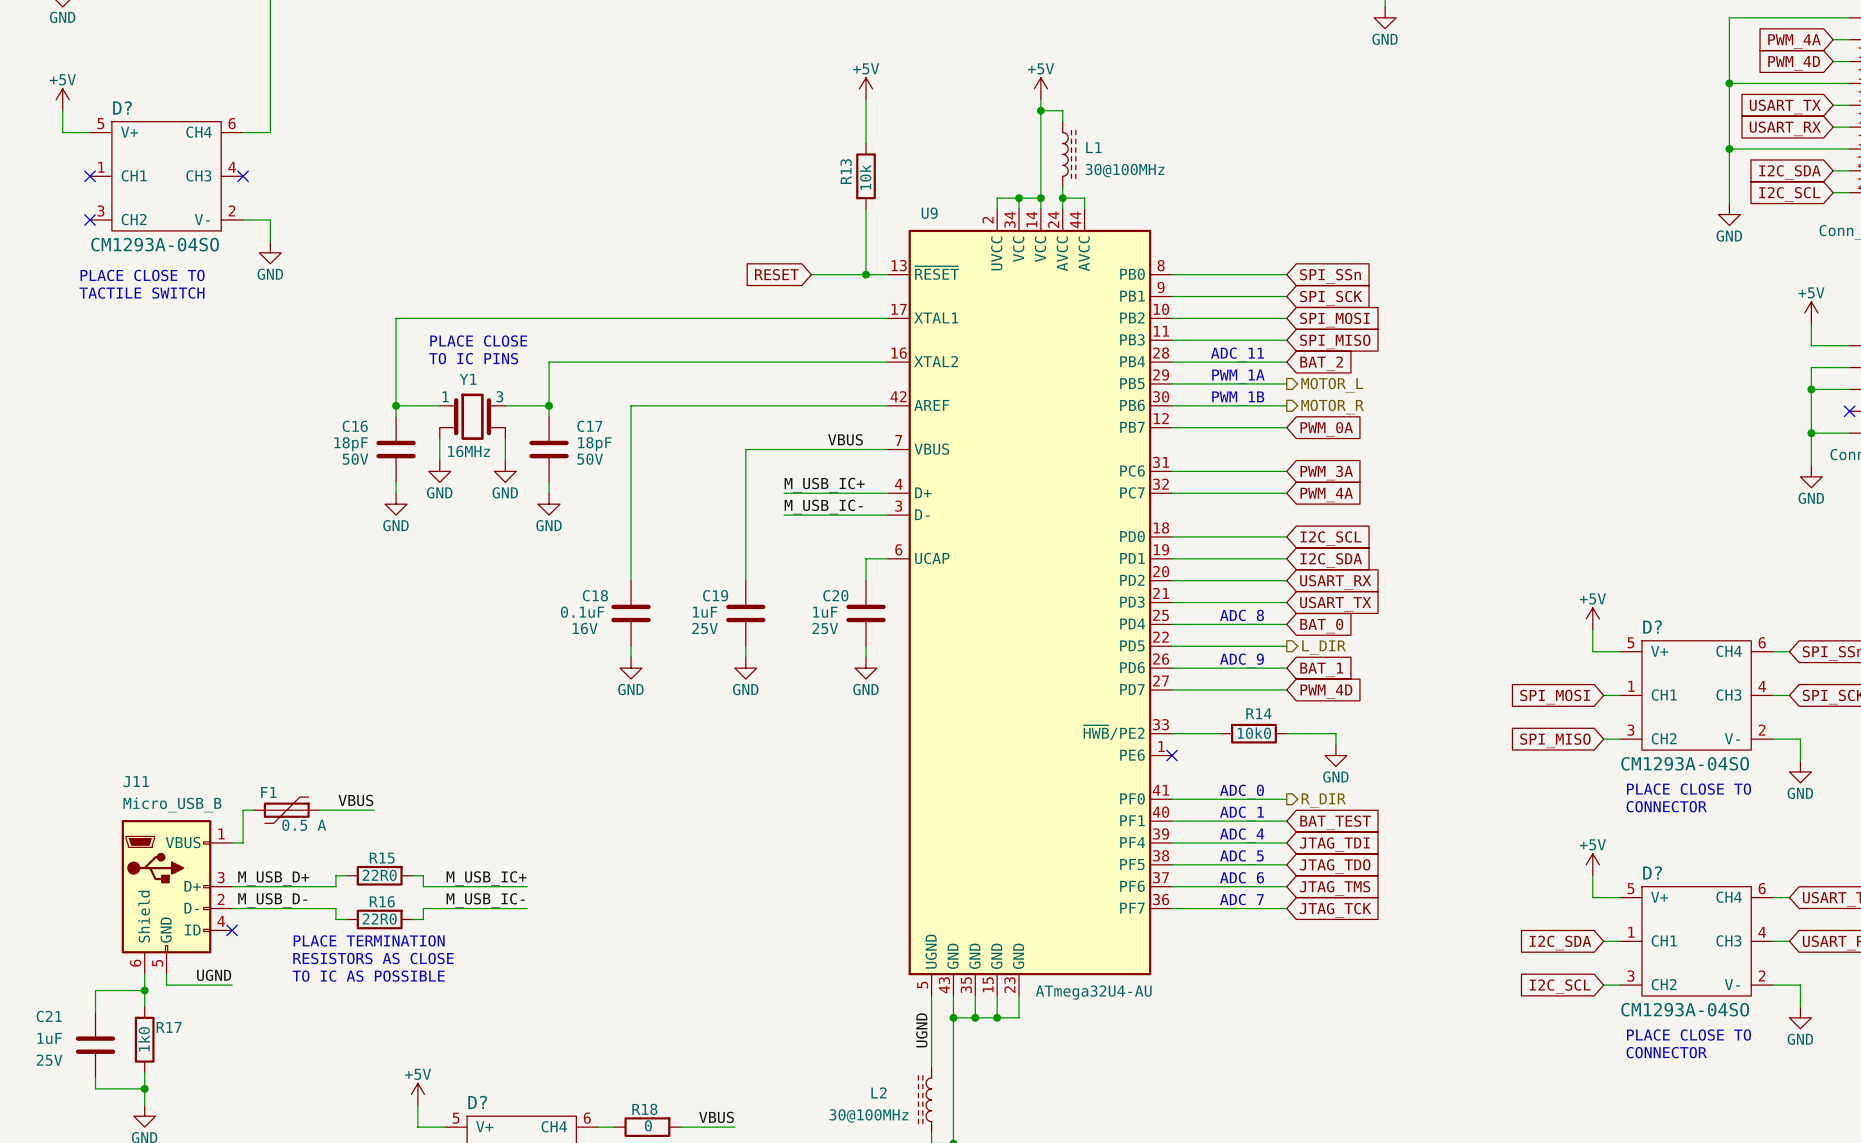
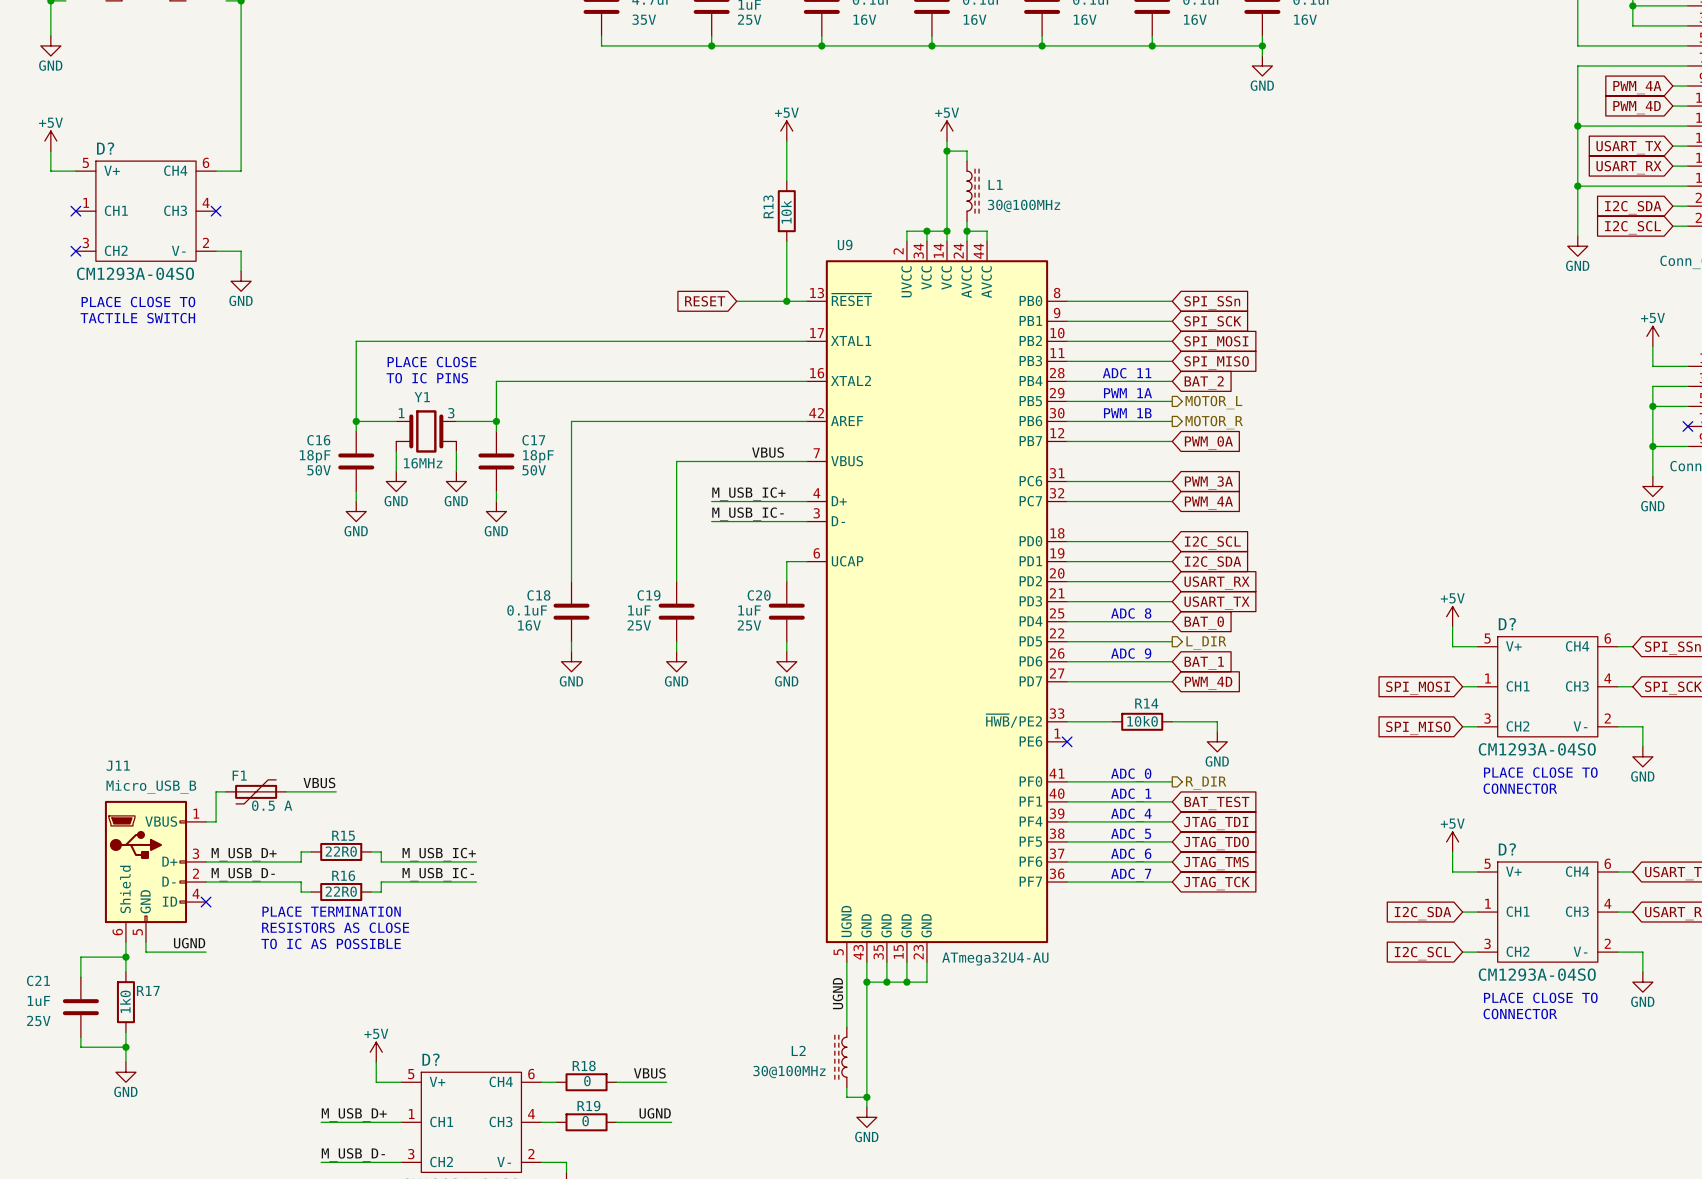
text position: PLACE CLOSE TO (142, 275) -> PLACE CLOSE TO (138, 302)
text position: TACTILE SWITCH (141, 293) -> TACTILE SWITCH (137, 318)

